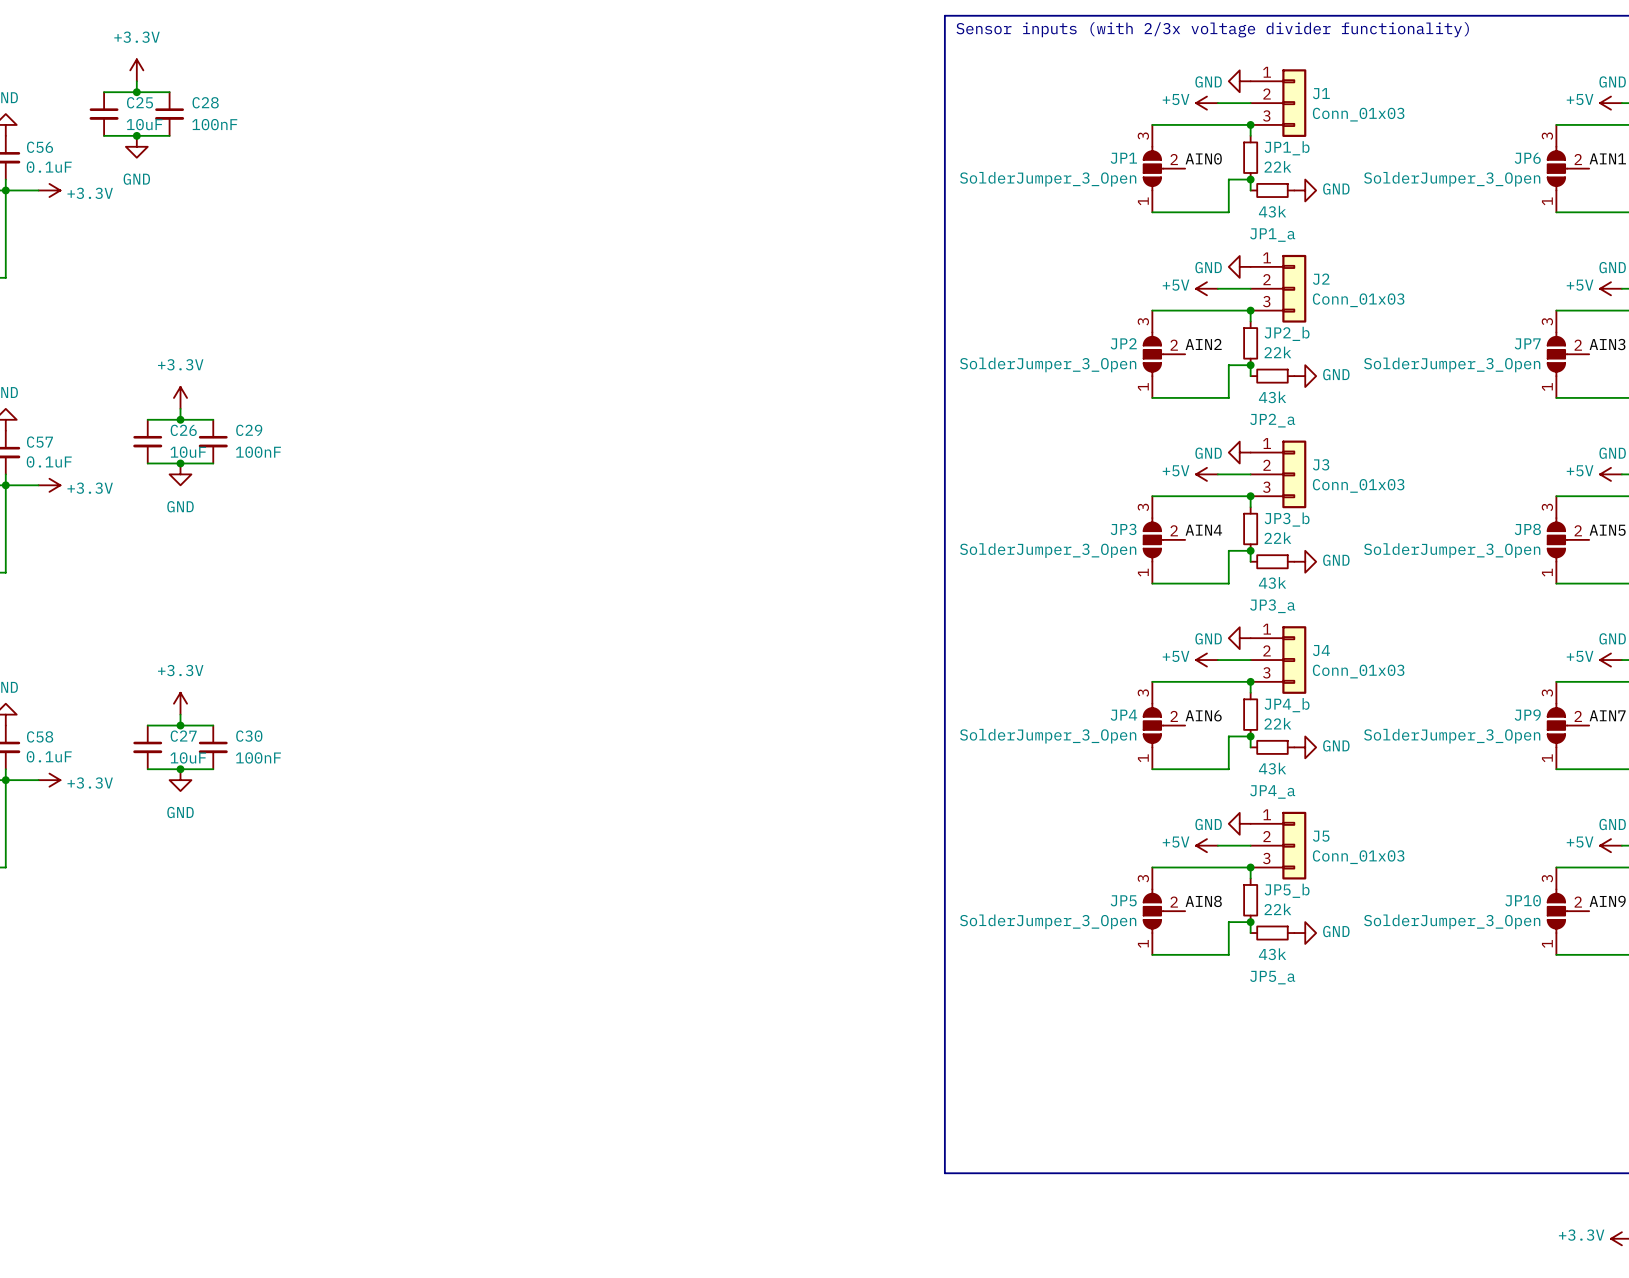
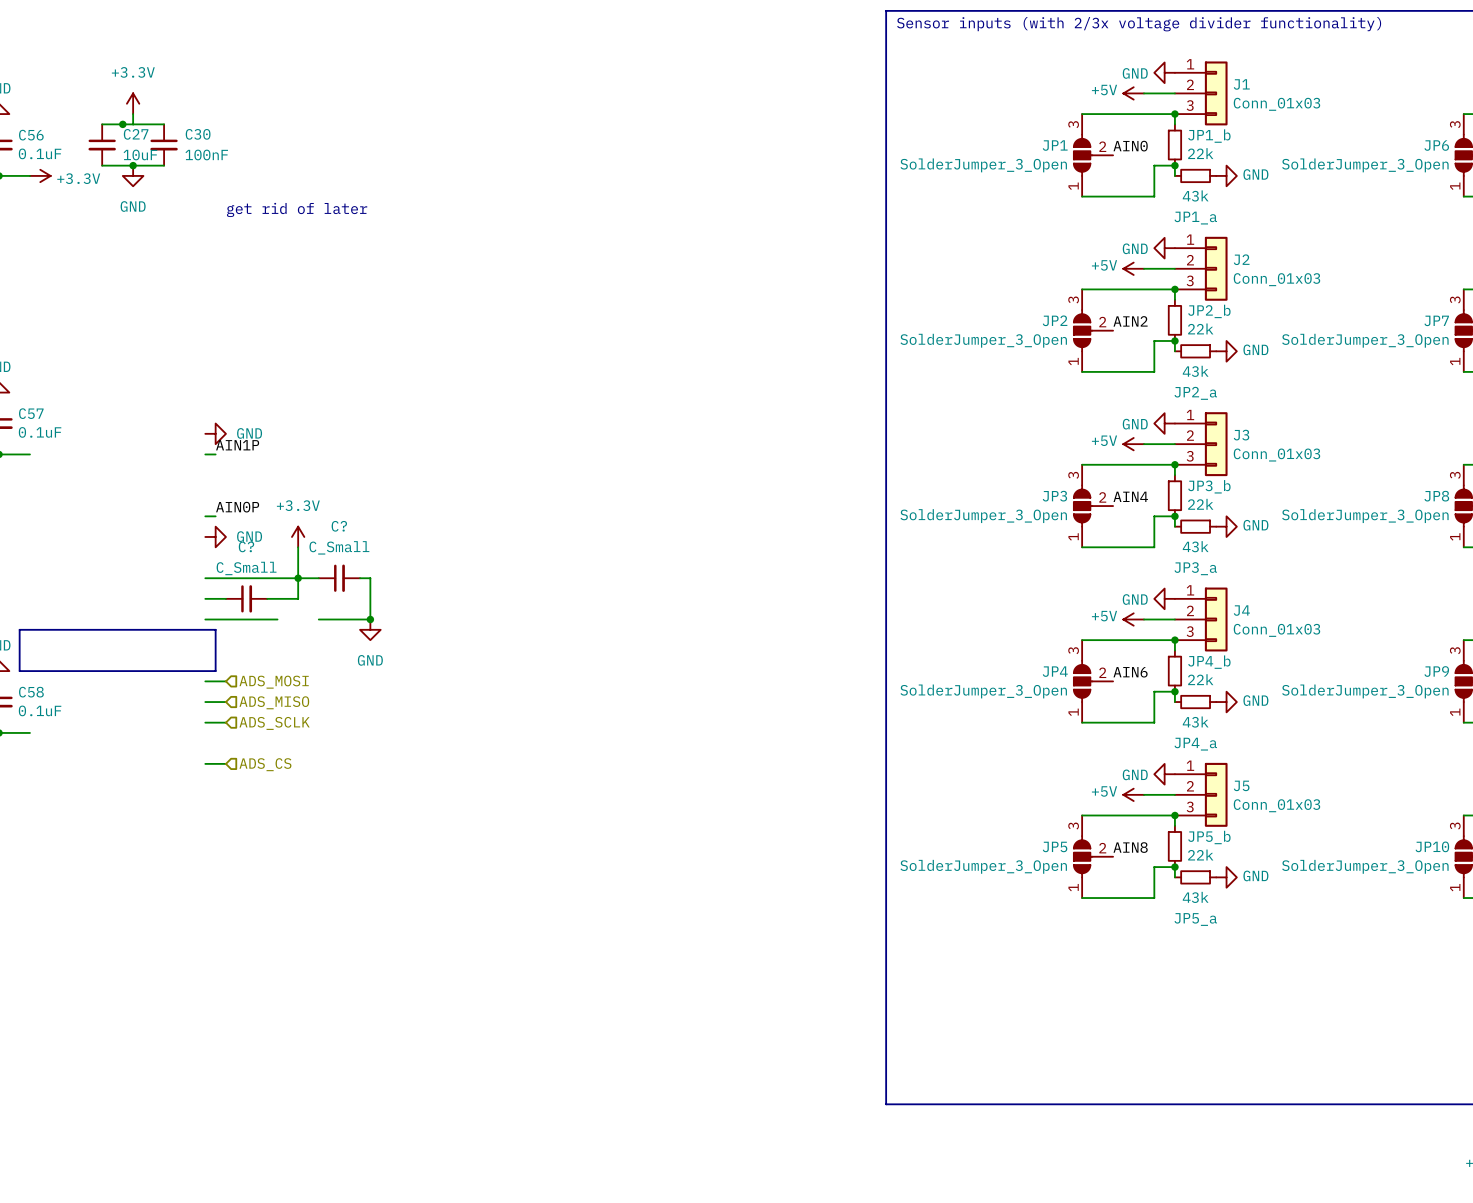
power symbol position: +3.3V (136, 70) -> +3.3V (133, 103)
wire: (136, 81) (136, 92) -> (133, 114) (133, 124)
wire: (104, 92) (169, 92) -> (102, 165) (164, 165)
junction: (136, 92) -> none
C25: 10uF (104, 114) -> none
C28: 100nF (169, 114) -> none
wire: (104, 135) (114, 135) -> (153, 124) (164, 124)
power symbol position: GND (136, 146) -> GND (133, 175)
junction: none -> (133, 165)
text: none -> get rid of later (297, 209)
power symbol: +3.3V (180, 397) -> none
wire: (180, 408) (180, 419) -> none
wire: (147, 419) (213, 419) -> none
junction: (180, 419) -> none
C26: 10uF (147, 441) -> none
C29: 100nF (213, 441) -> none
wire: (147, 463) (213, 463) -> none
junction: (180, 463) -> none
power symbol rotation: 0° (180, 474) -> 90° counterclockwise (215, 433)
power symbol position: GND (180, 474) -> GND (215, 433)
label: none -> AIN1P (237, 445)
power symbol: +3.3V (49, 485) -> none
wire: none -> (205, 454) (215, 454)
label: none -> AIN0P (237, 507)
wire: none -> (205, 516) (215, 516)
power symbol: none -> GND (215, 536)
power symbol: none -> +3.3V (298, 536)
wire: none -> (298, 547) (298, 598) (267, 598)
wire: none -> (205, 578) (318, 578)
junction: none -> (298, 578)
C?: none -> C_Small (339, 578)
wire: none -> (360, 578) (370, 578) (370, 619) (318, 619)
wire: none -> (205, 598) (225, 598)
C?: none -> C_Small (246, 598)
wire: none -> (205, 619) (277, 619)
junction: none -> (370, 619)
line: none -> (19, 629) (19, 671) (215, 671) (215, 629) (19, 629)
power symbol: none -> GND (370, 629)
power symbol: +3.3V (180, 703) -> none
wire: (180, 714) (180, 725) -> none
wire: (147, 725) (213, 725) -> none
junction: (180, 725) -> none
wire: none -> (205, 681) (225, 681)
hierarchical label: none -> ADS_MOSI (274, 682)
C27 position: (147, 747) -> (102, 145)
C30 position: (213, 747) -> (164, 145)
wire: none -> (205, 702) (225, 702)
hierarchical label: none -> ADS_MISO (274, 702)
wire: (147, 769) (213, 769) -> none
junction: (180, 769) -> none
wire: none -> (205, 722) (225, 722)
hierarchical label: none -> ADS_SCLK (274, 723)
power symbol: +3.3V (49, 780) -> none
power symbol: GND (180, 780) -> none
wire: none -> (205, 763) (225, 763)
hierarchical label: none -> ADS_CS (265, 764)

